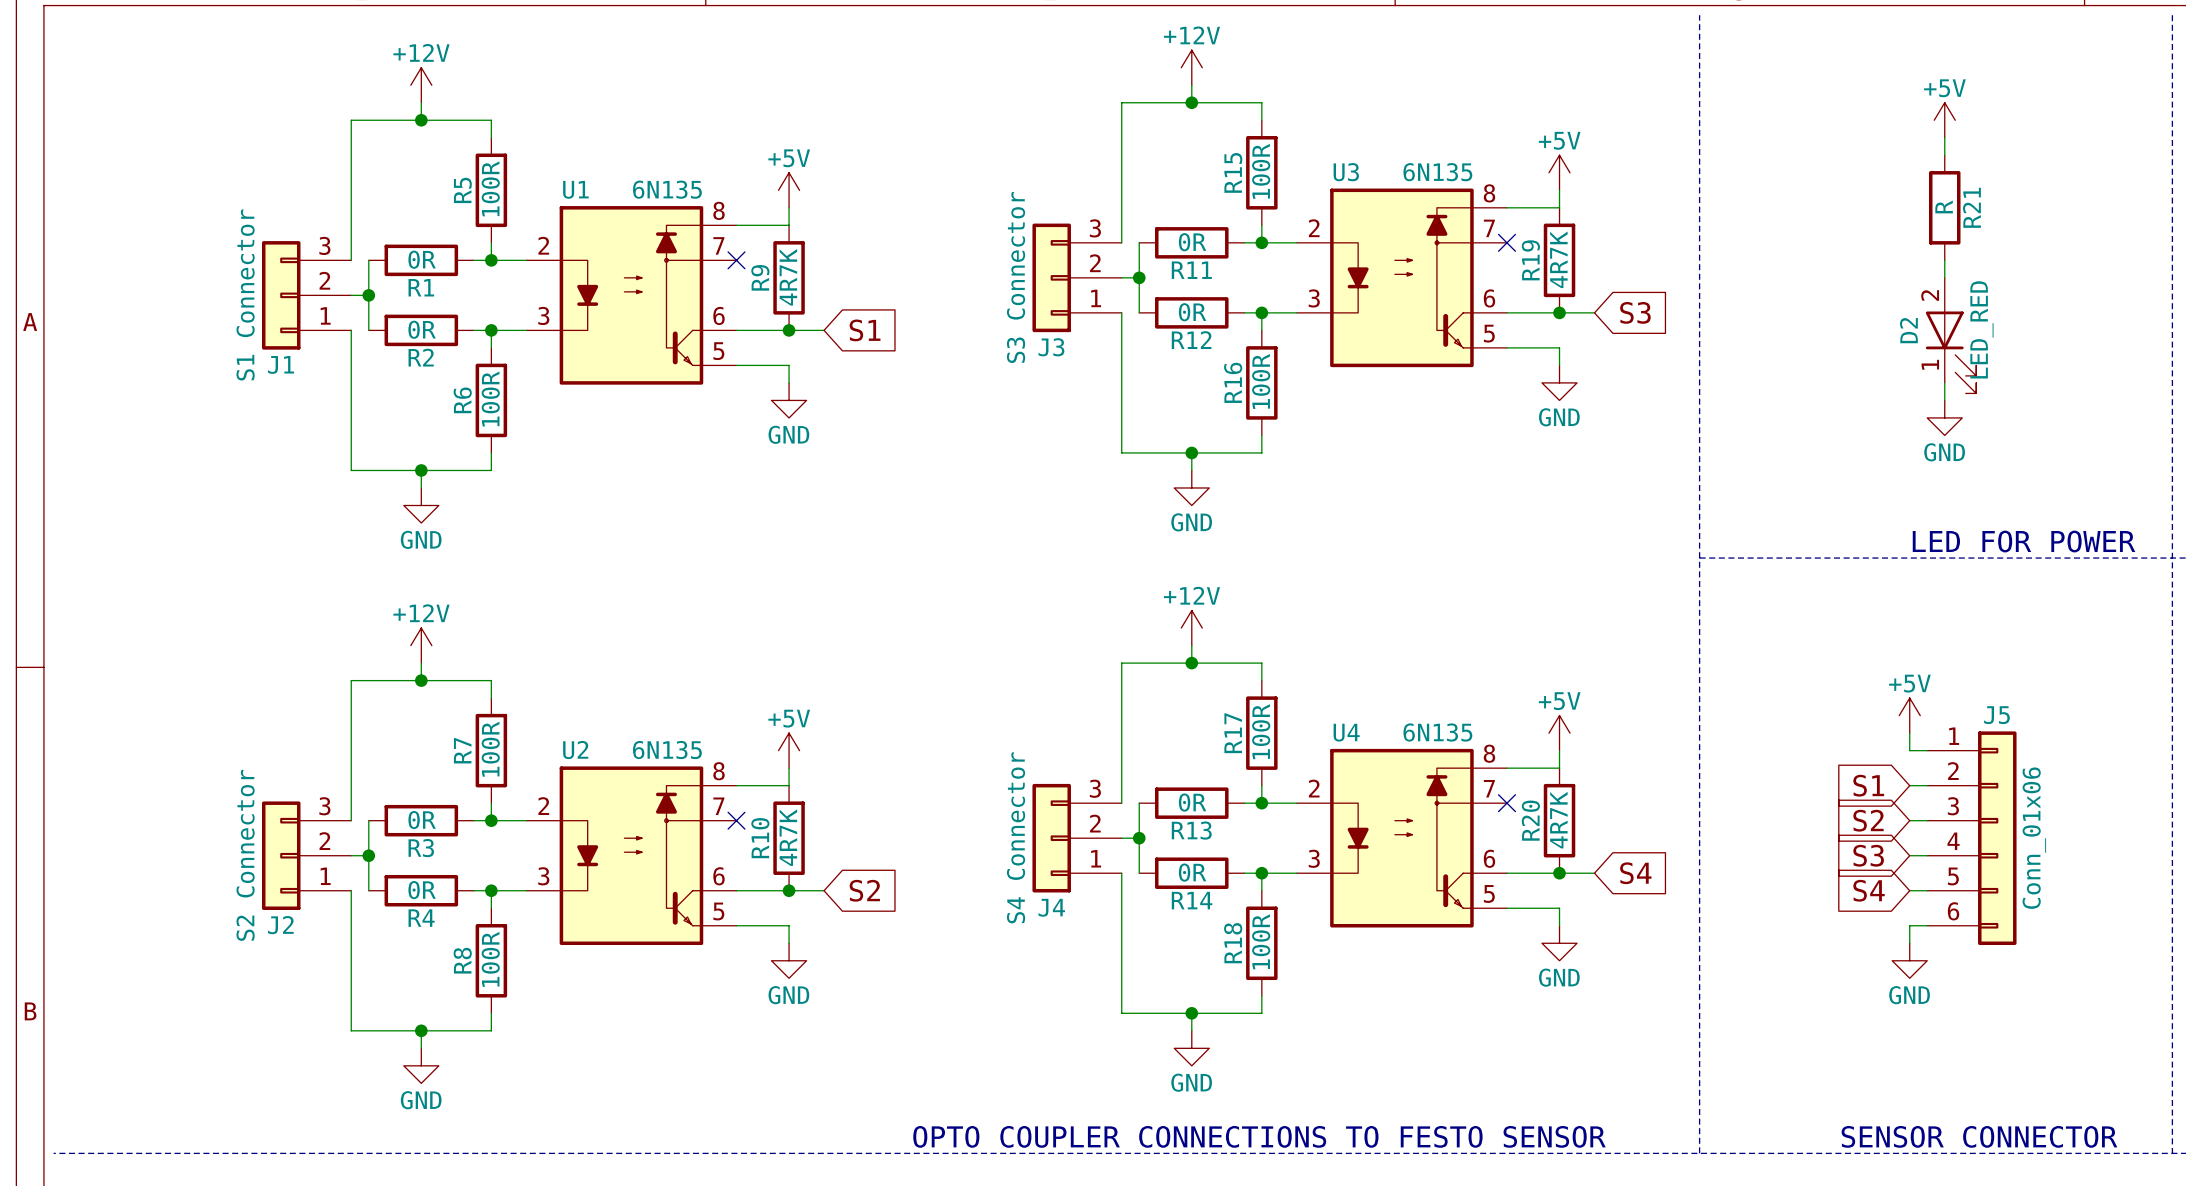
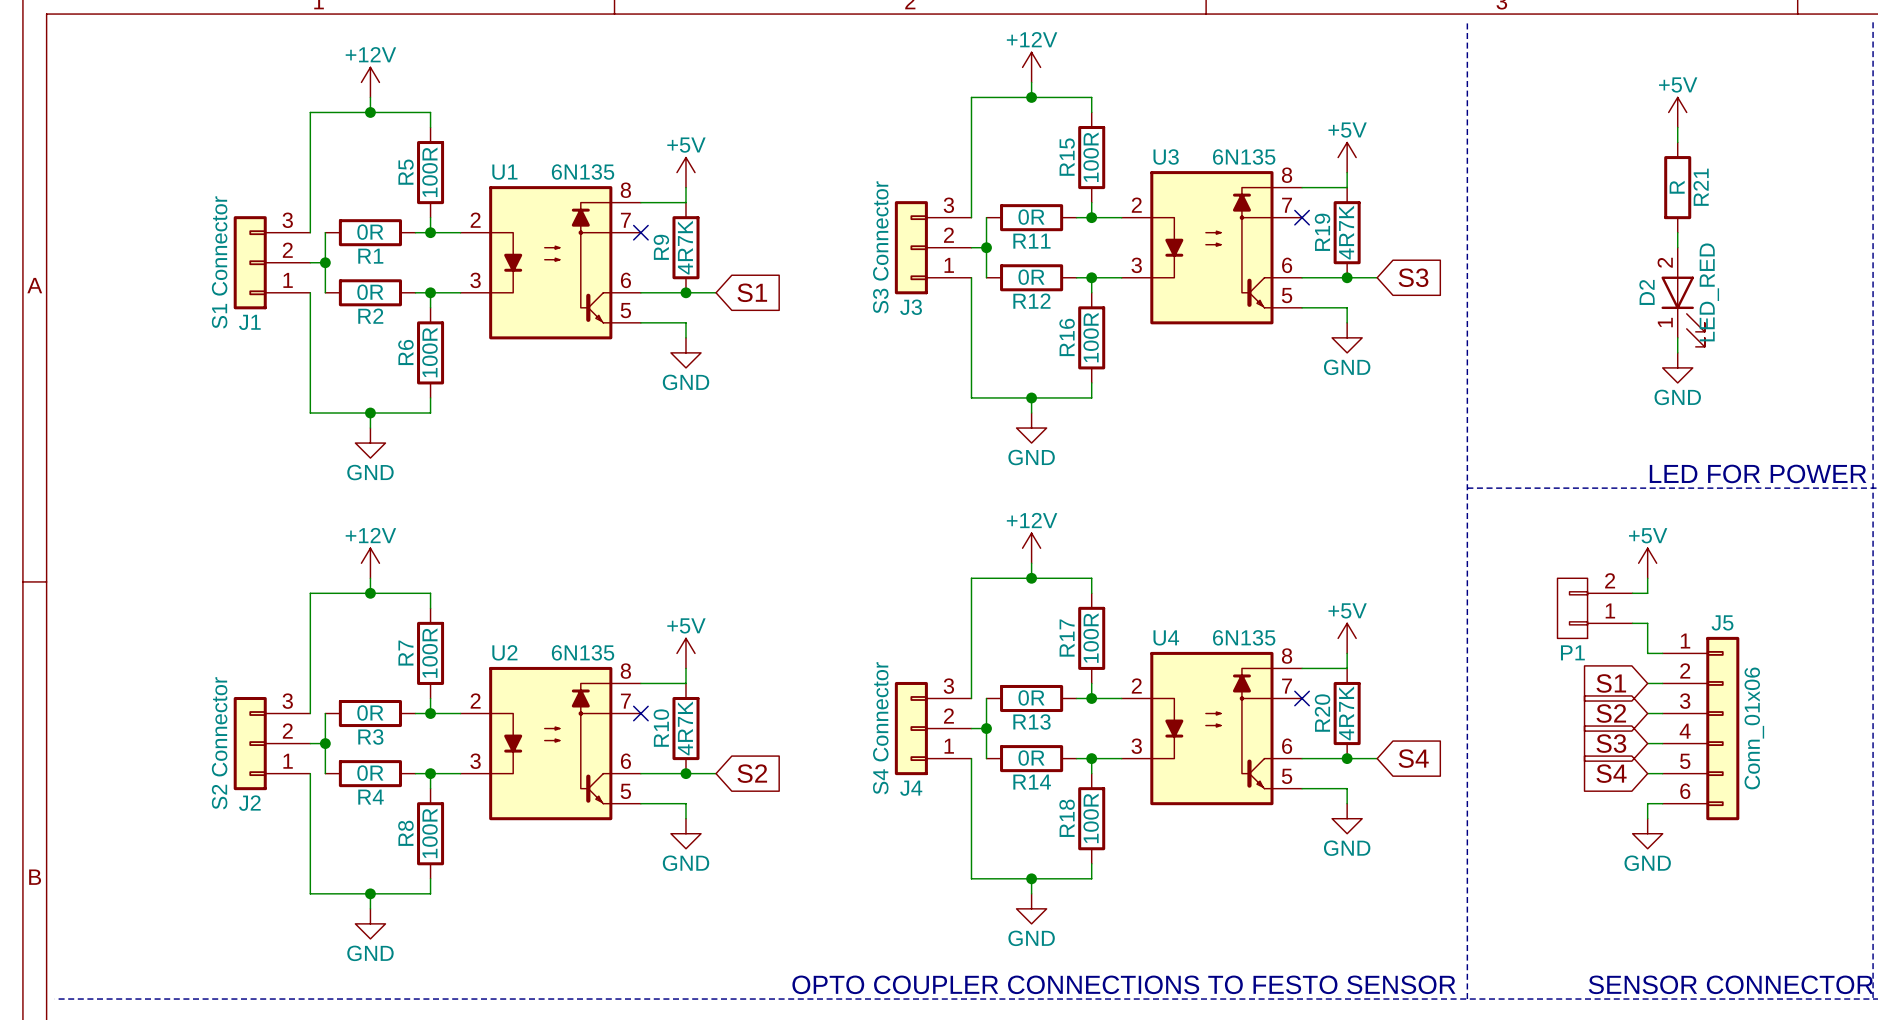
wire: none -> (1647, 578) (1647, 593) (1632, 593)
P1: none -> (1595, 608)
power symbol position: +5V (1909, 715) -> +5V (1647, 563)

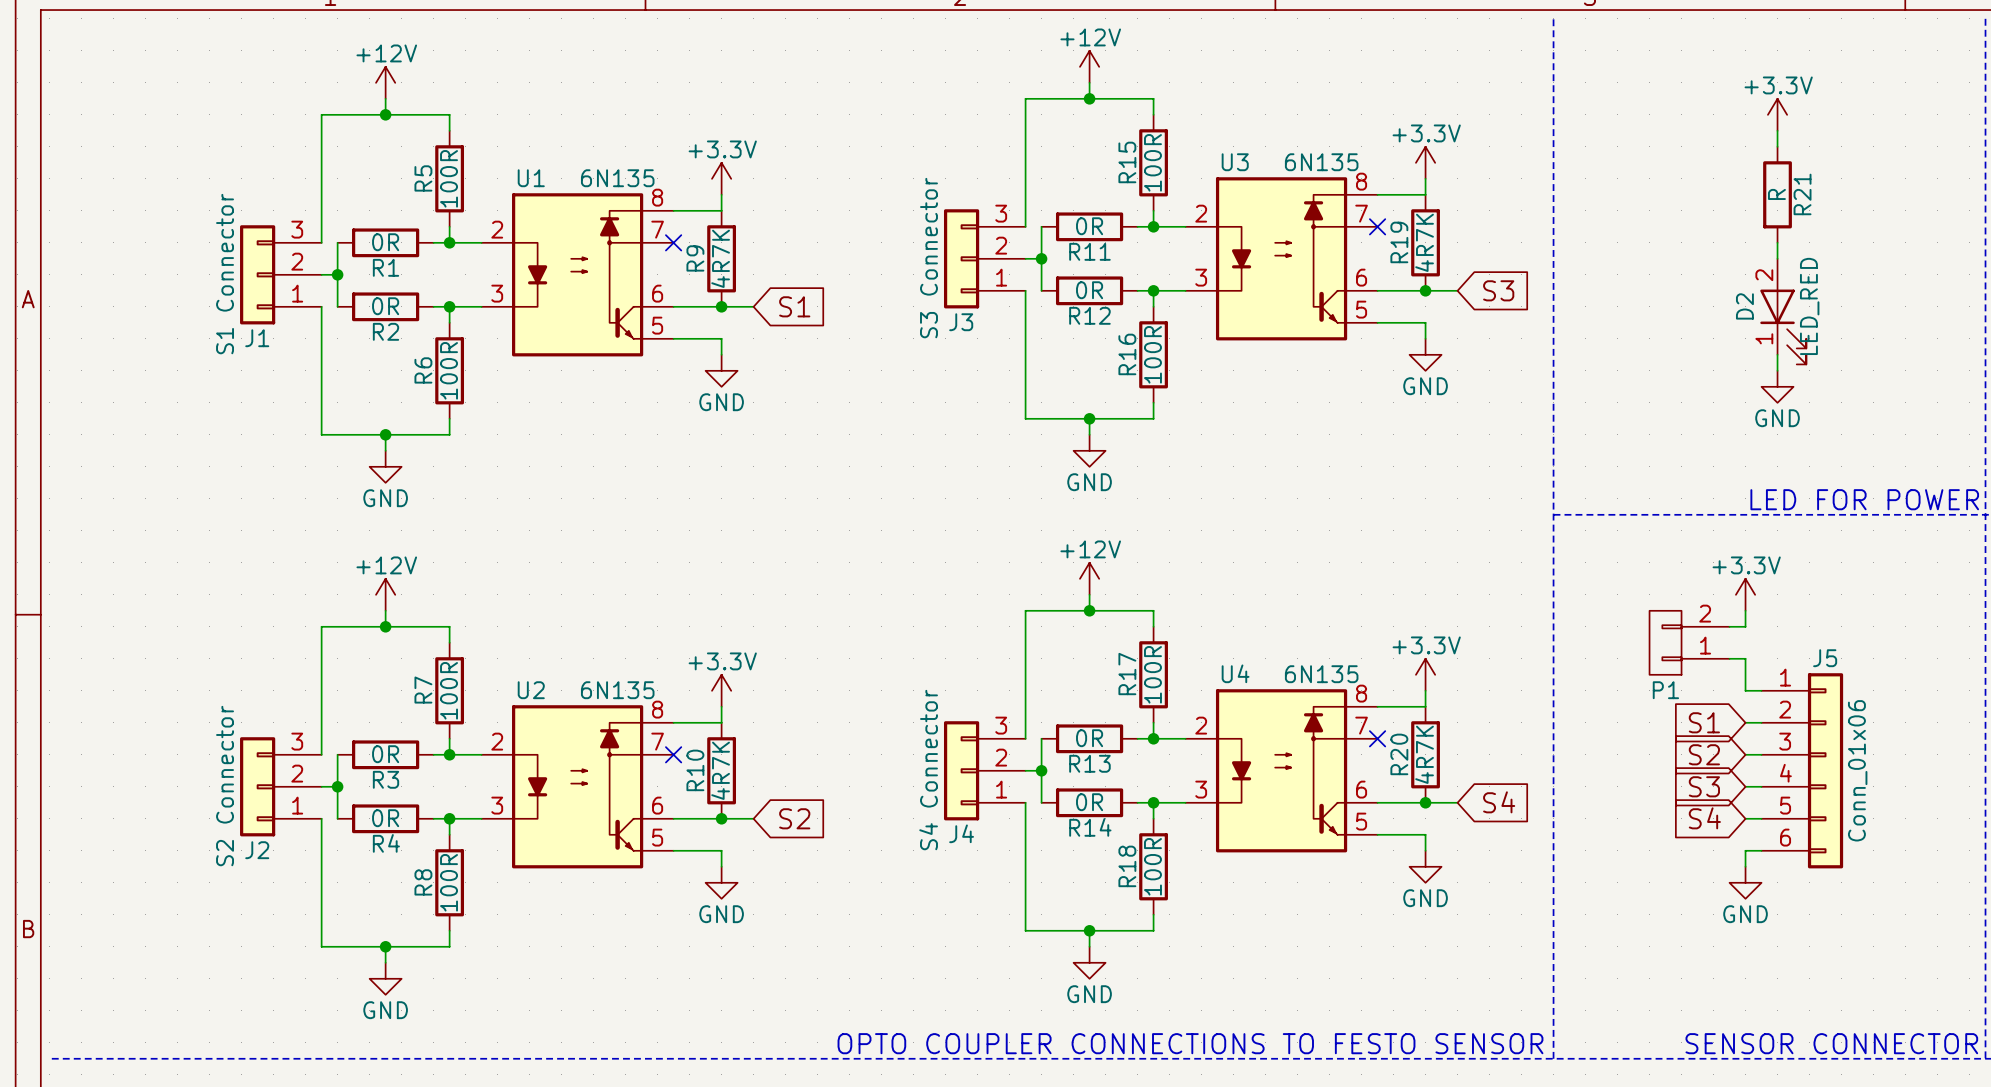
power symbol: +5V (1677, 112) -> +3.3V (1777, 114)
power symbol: +5V (1347, 157) -> +3.3V (1425, 162)
power symbol: +5V (685, 172) -> +3.3V (721, 178)
power symbol: +5V (1647, 563) -> +3.3V (1745, 594)
power symbol: +5V (1347, 638) -> +3.3V (1425, 674)
power symbol: +5V (685, 653) -> +3.3V (721, 690)

